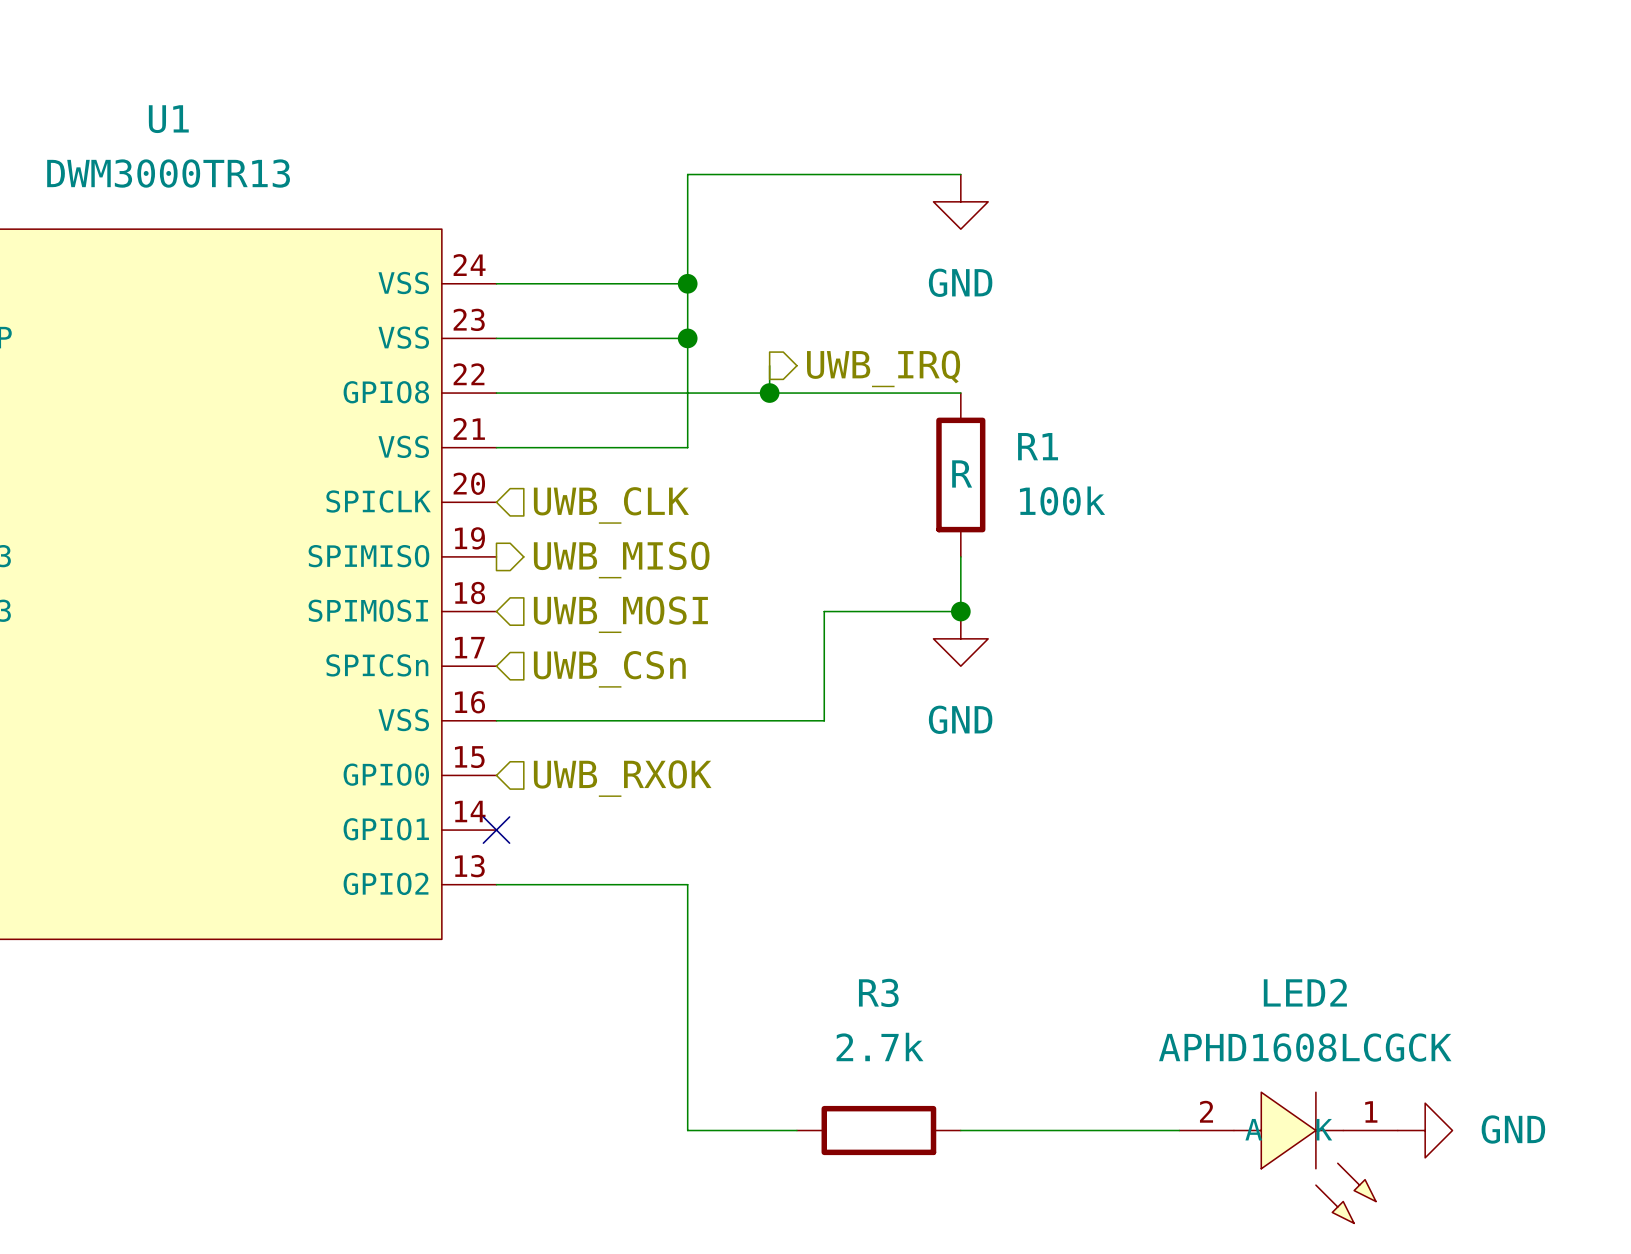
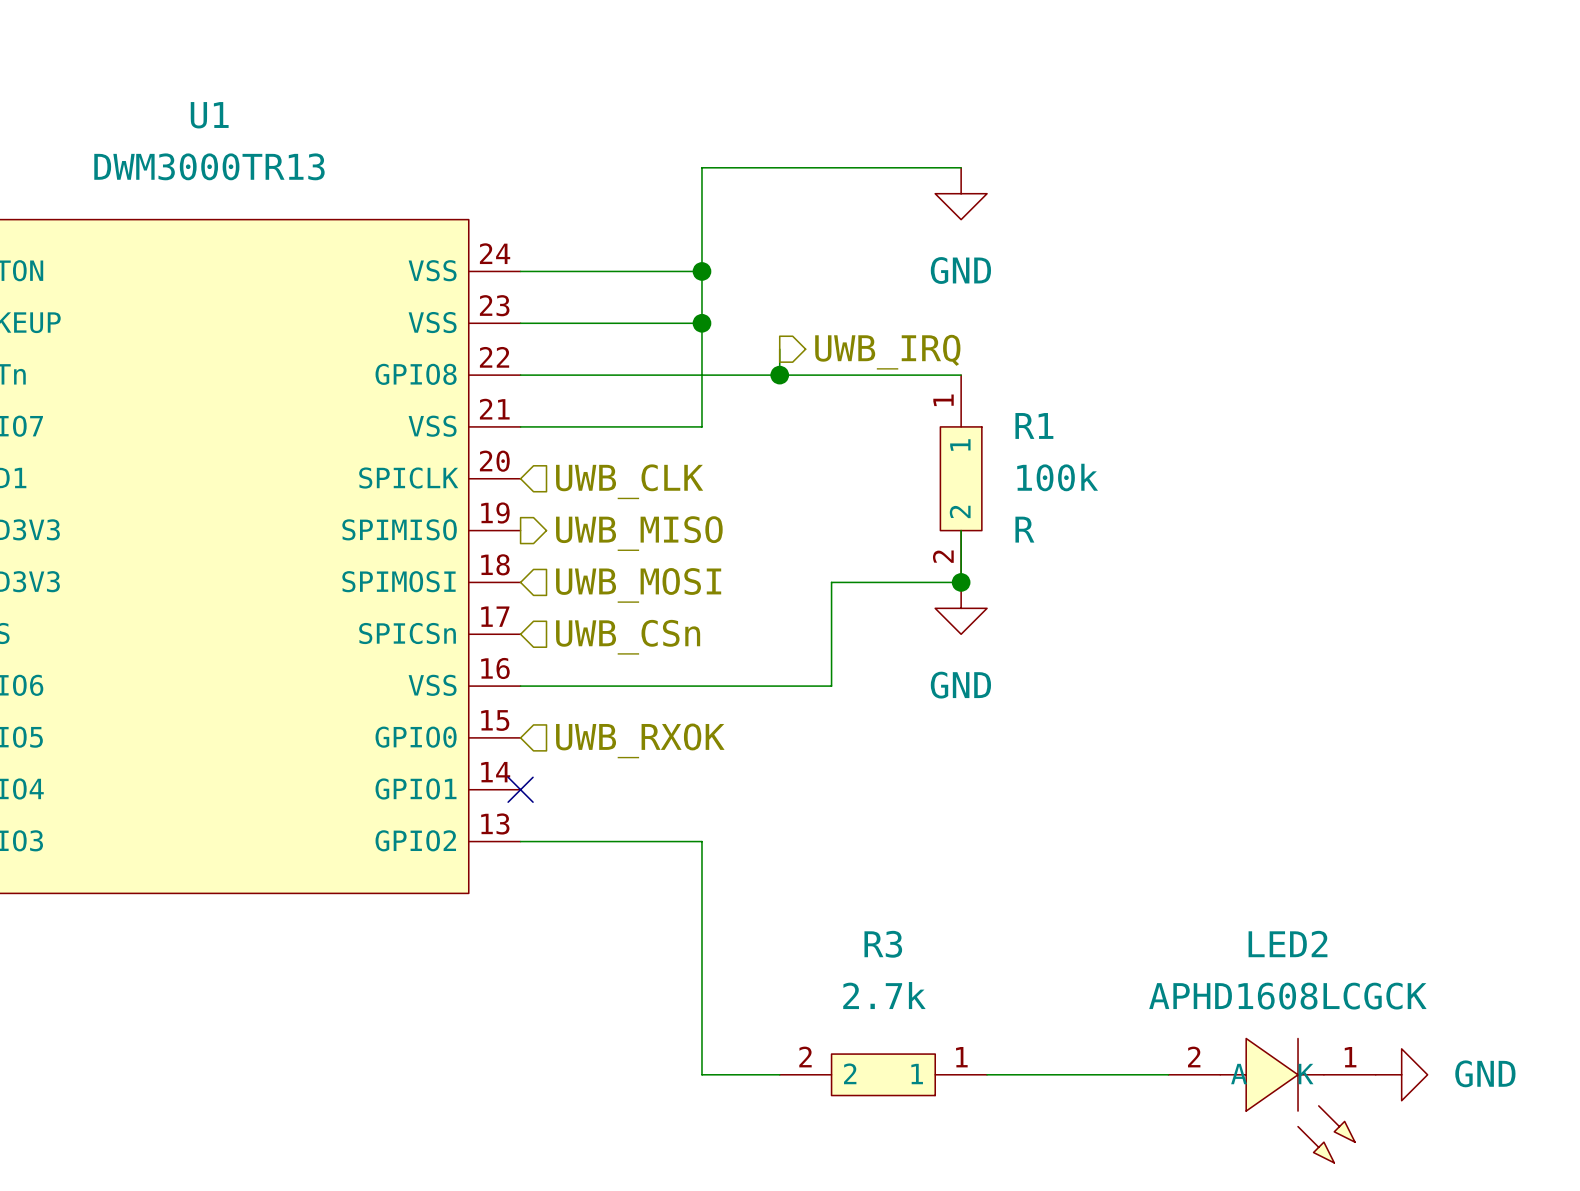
R1 symbol: [936, 393, 986, 557] -> [940, 375, 982, 583]
R1 text position: R (962, 473) -> R (1024, 529)
R3 symbol: [796, 1105, 961, 1156] -> [779, 1054, 988, 1096]

